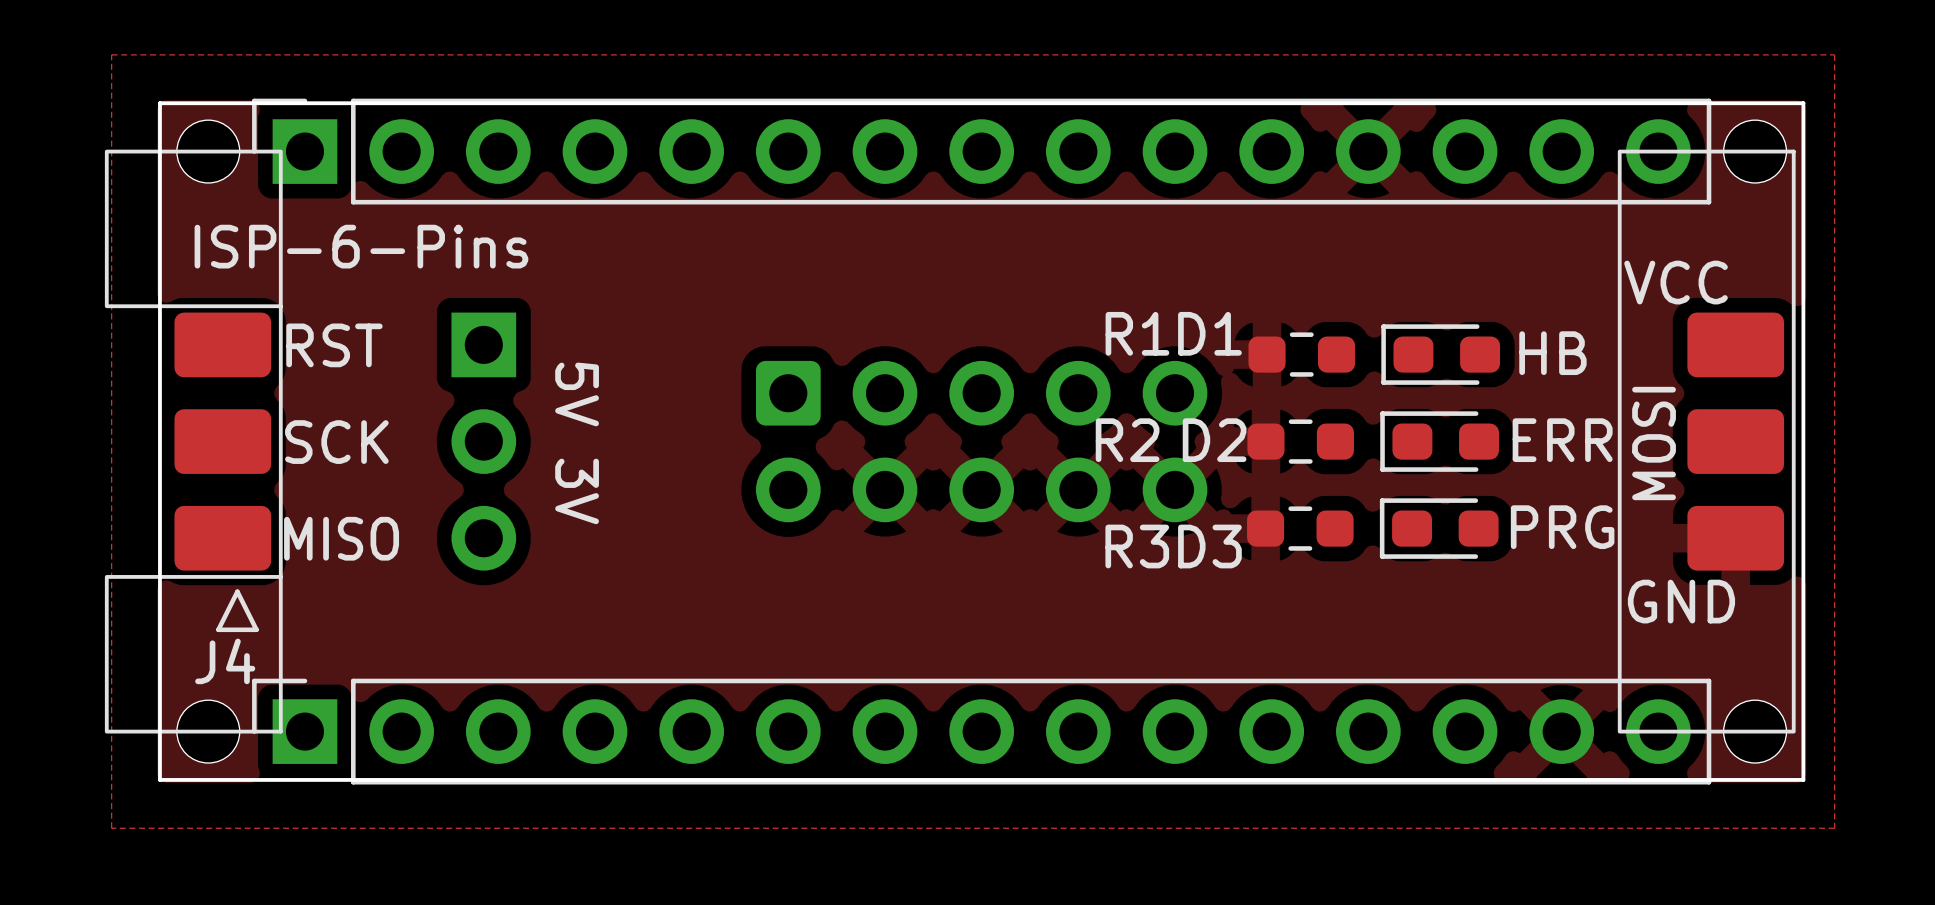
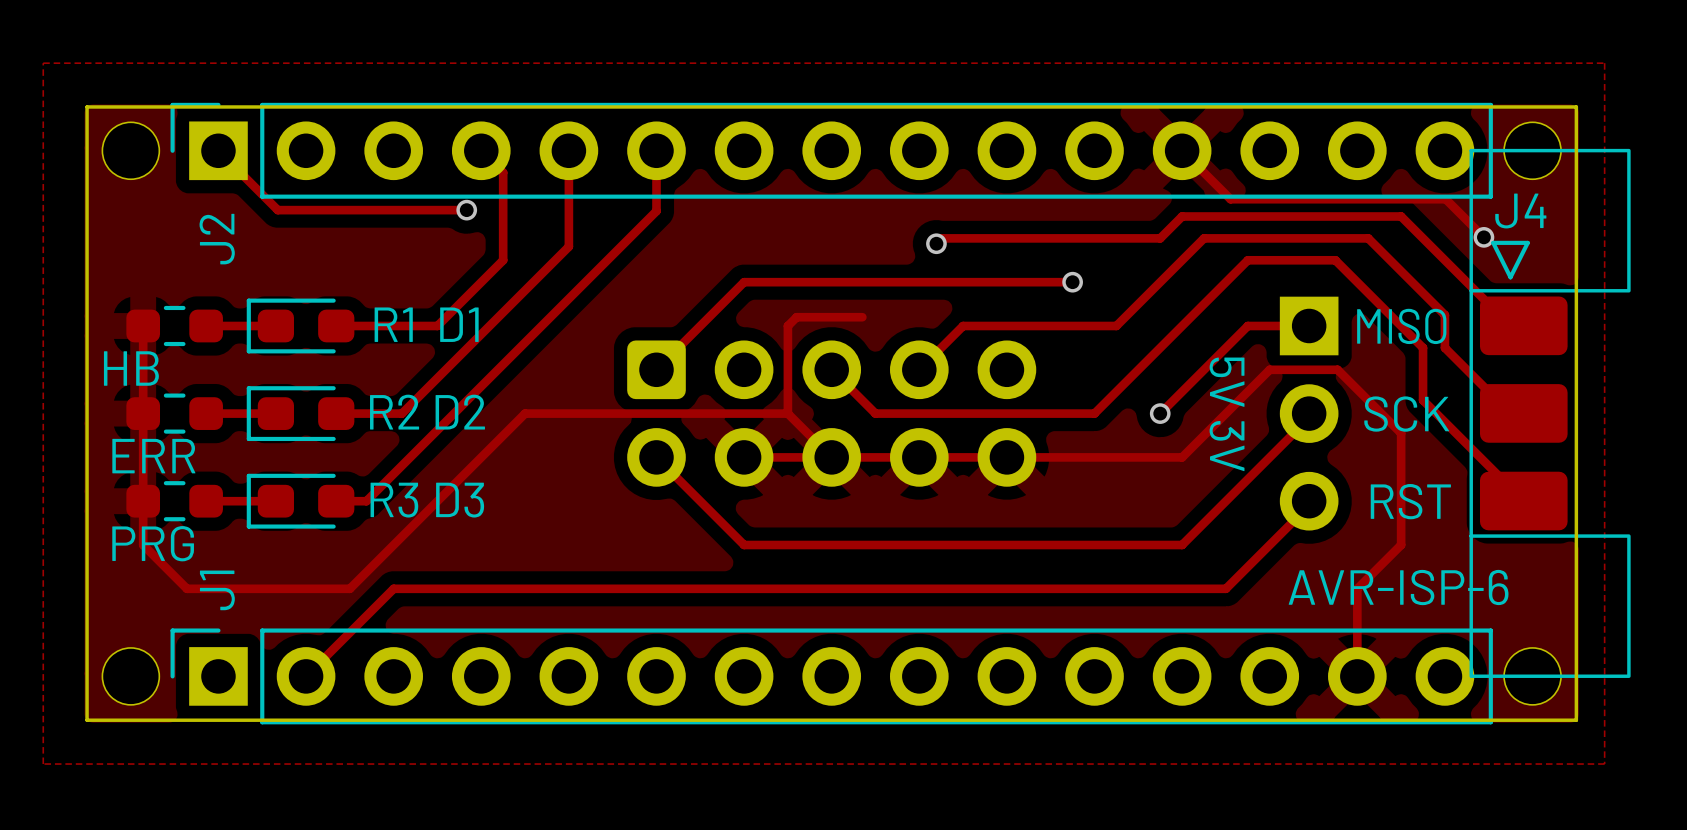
track: none -> (218, 150) (277, 210) (466, 210)
track: none -> (481, 150) (503, 172) (503, 260) (437, 325) (336, 325)
track: none -> (568, 150) (568, 246) (401, 413) (336, 413)
track: none -> (656, 150) (656, 211) (366, 501) (336, 501)
track: none -> (1182, 150) (1230, 199) (1445, 199) (1483, 237)
via: none -> (466, 210)
J4 value: ISP-6-Pins (361, 246) -> AVR-ISP-6 (1398, 587)
via: none -> (1483, 237)
J2 name: none -> J2 (217, 239)
track: none -> (936, 243) (941, 238) (1160, 238) (1182, 216) (1401, 216) (1510, 325) (1523, 325)
via: none -> (936, 243)
text: VCC (1676, 282) -> none
track: none -> (1072, 282) (744, 282) (656, 369)
via: none -> (1072, 282)
R1 name position: R1 (1137, 333) -> R1 (393, 324)
D1 name position: D1 (1209, 333) -> D1 (459, 324)
track: none -> (862, 317) (796, 317) (787, 325) (787, 413)
track: none -> (143, 325) (143, 545) (186, 588) (349, 588) (525, 413) (787, 413)
track: none -> (206, 325) (275, 325)
track: none -> (1309, 325) (1247, 325) (1160, 413)
text: RST (334, 345) -> none
text: none -> MISO (1401, 326)
D1 value position: HB (1552, 353) -> HB (131, 368)
R1 position: (1301, 354) -> (174, 325)
D1 position: (1440, 354) -> (300, 325)
track: none -> (831, 369) (875, 413) (1094, 413) (1247, 260) (1335, 260) (1423, 347) (1423, 400) (1523, 501) (1488, 501)
track: none -> (919, 369) (963, 325) (1116, 325) (1204, 238) (1368, 238) (1444, 315) (1444, 347) (1510, 413) (1523, 413)
R2 name position: R2 (1127, 440) -> R2 (394, 412)
D2 name position: D2 (1214, 440) -> D2 (460, 412)
D2 value position: ERR (1562, 440) -> ERR (153, 456)
J4 rotation: 0° (193, 441) -> 180° (1550, 413)
J4 position: (193, 441) -> (1550, 413)
track: none -> (206, 413) (275, 413)
part: (483, 441) -> none
track: none -> (787, 413) (831, 457)
R2 position: (1300, 441) -> (174, 413)
via: none -> (1160, 413)
D2 position: (1439, 441) -> (300, 413)
track: none -> (1309, 413) (1309, 417) (1182, 545) (744, 545) (656, 457)
part: none -> (1309, 413)
part: (1706, 441) -> none
text: SCK (336, 442) -> none
text: none -> SCK (1406, 414)
text position: 5V 3V (577, 443) -> 5V 3V (1227, 414)
text: MOSI (1654, 443) -> none
track: none -> (744, 457) (1182, 457) (1269, 369) (1337, 369) (1401, 433) (1401, 545) (1357, 588) (1357, 676)
D3 value position: PRG (1562, 527) -> PRG (153, 543)
R3 position: (1300, 528) -> (174, 501)
D3 position: (1439, 528) -> (300, 501)
track: none -> (206, 501) (275, 501)
text: MISO (341, 538) -> none
track: none -> (1309, 501) (1309, 505) (1225, 588) (393, 588) (306, 676)
text: none -> RST (1410, 501)
R3 name position: R3 (1137, 546) -> R3 (394, 500)
D3 name position: D3 (1209, 546) -> D3 (460, 500)
text: GND (1681, 601) -> none
J1 name: none -> J1 (217, 590)

